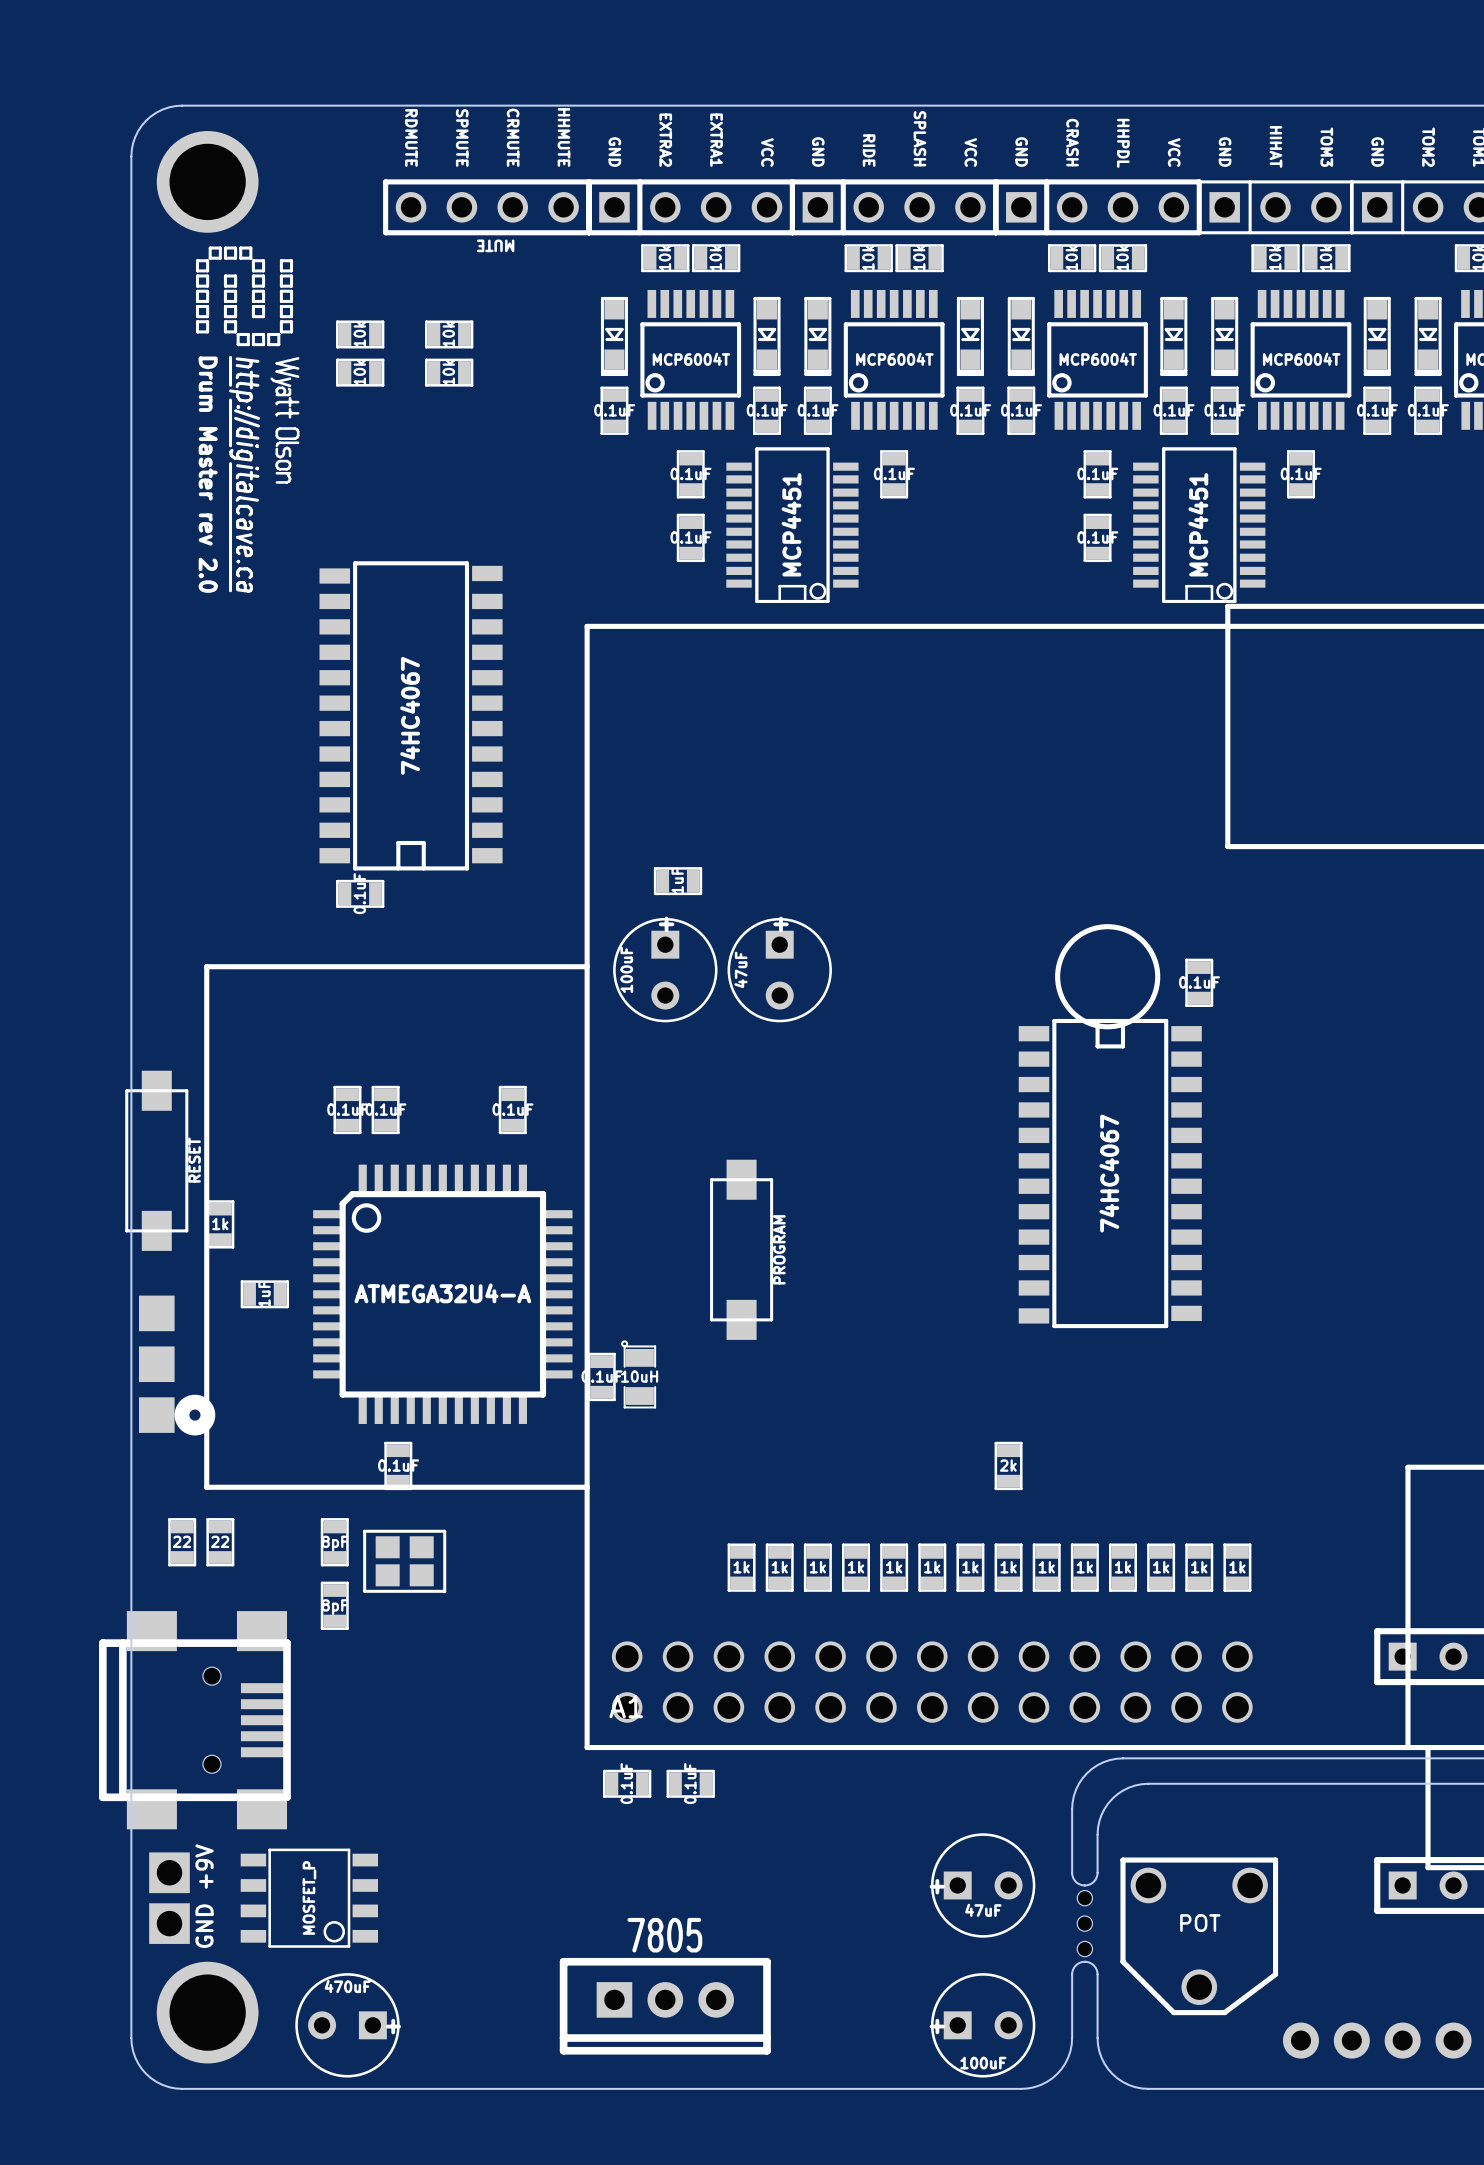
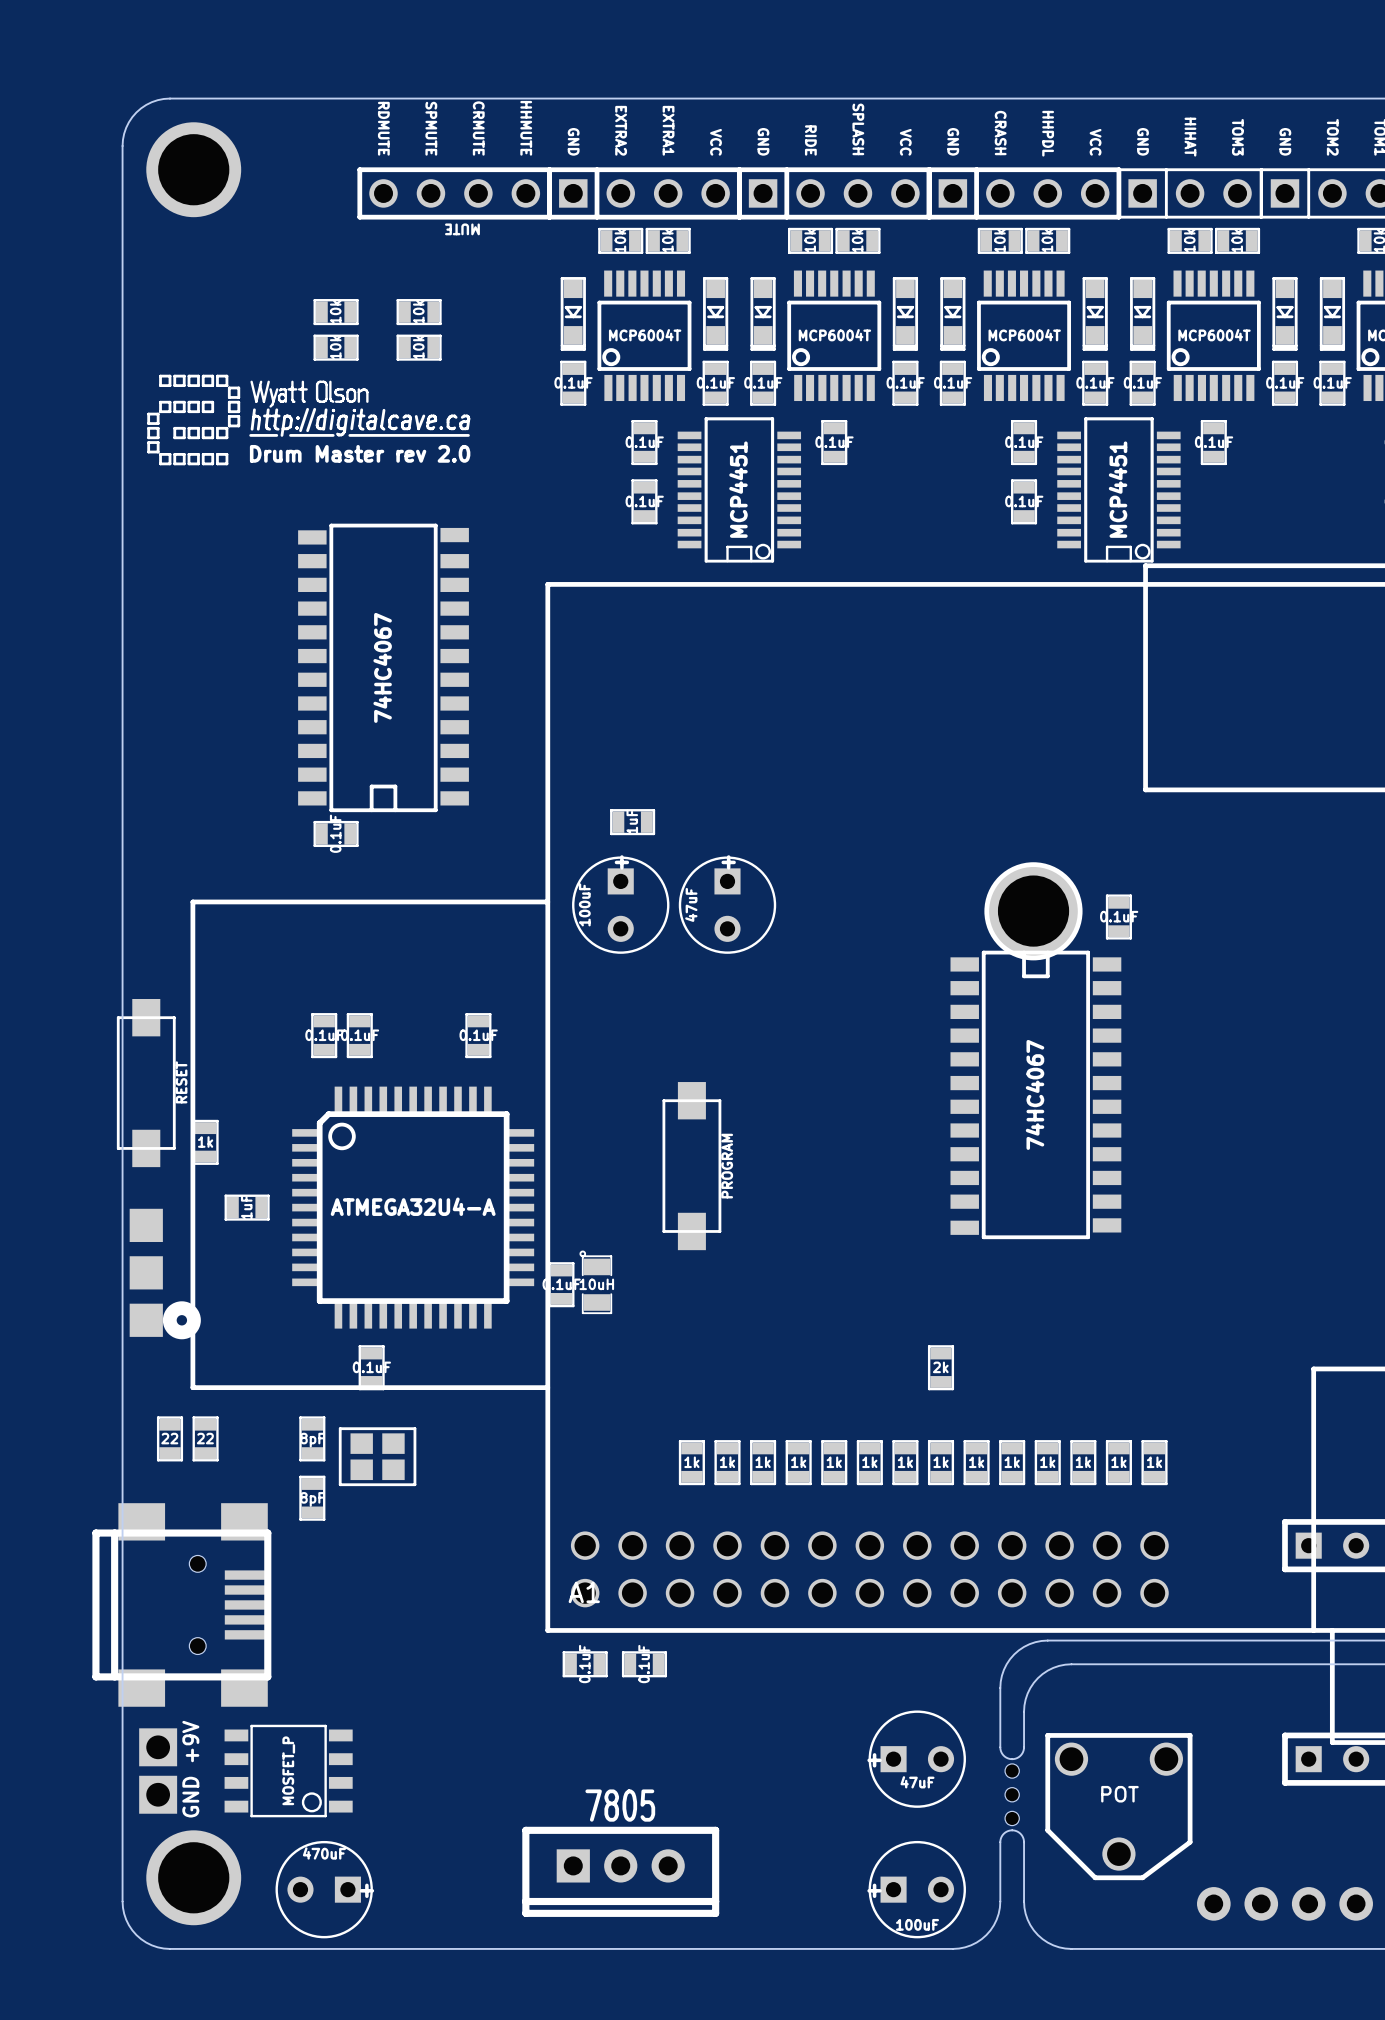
drawing: [195, 246, 300, 593] -> none
drawing: none -> [147, 374, 471, 466]
text rotation: 0° (208, 474) -> 90° counterclockwise (360, 453)
part: none -> (1033, 911)

